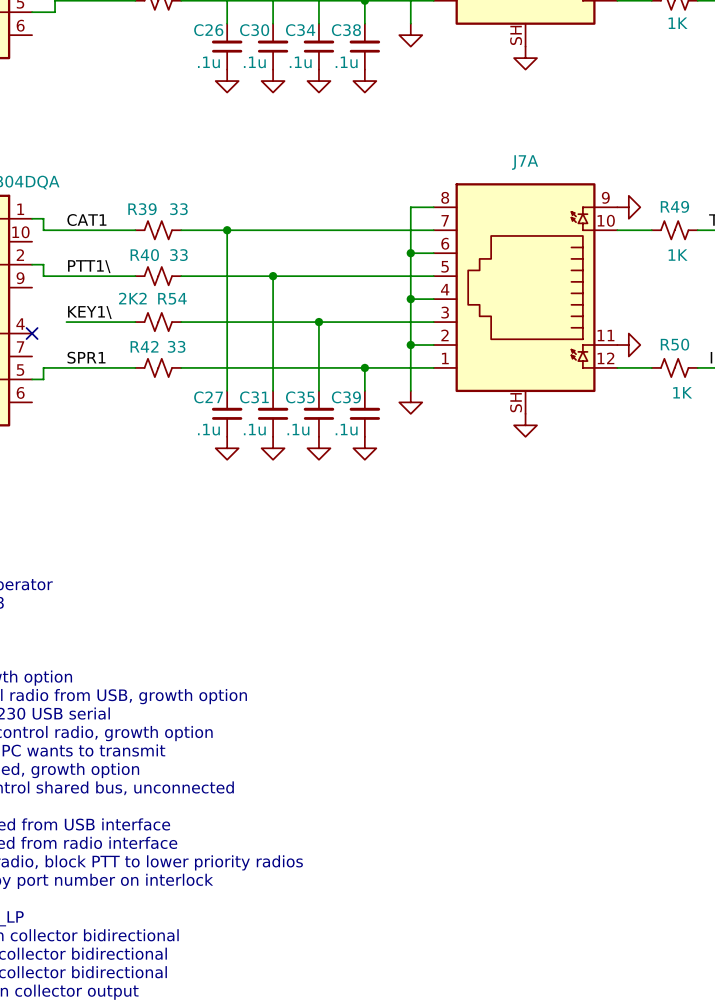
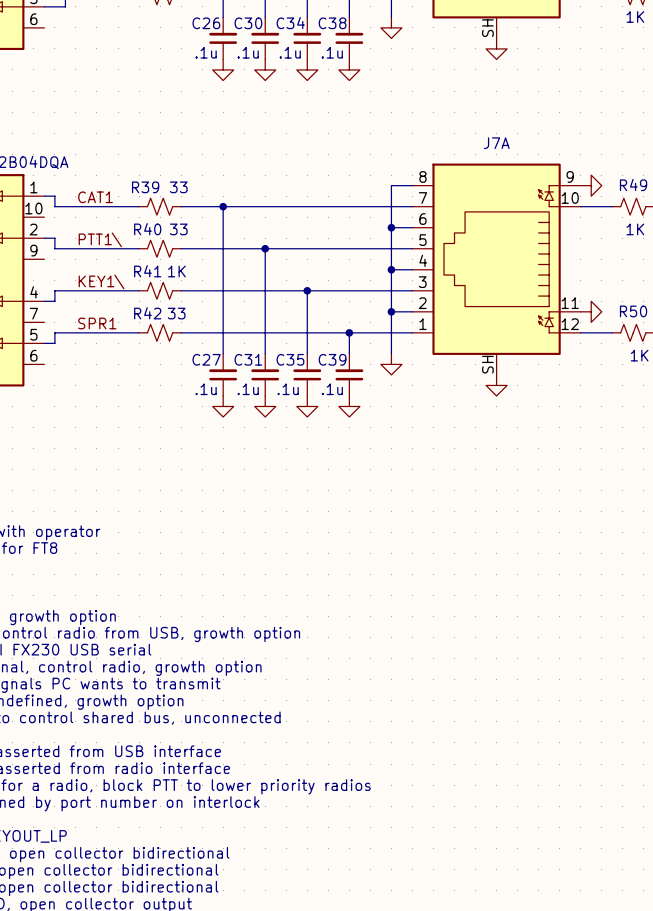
R54 value: 2K2 (132, 298) -> 1K (176, 271)
R54 name: R54 (172, 298) -> R41 (147, 271)
wire: none -> (75, 290) (54, 290) (54, 301) (44, 301)
no-connect mark: (32, 333) -> none

